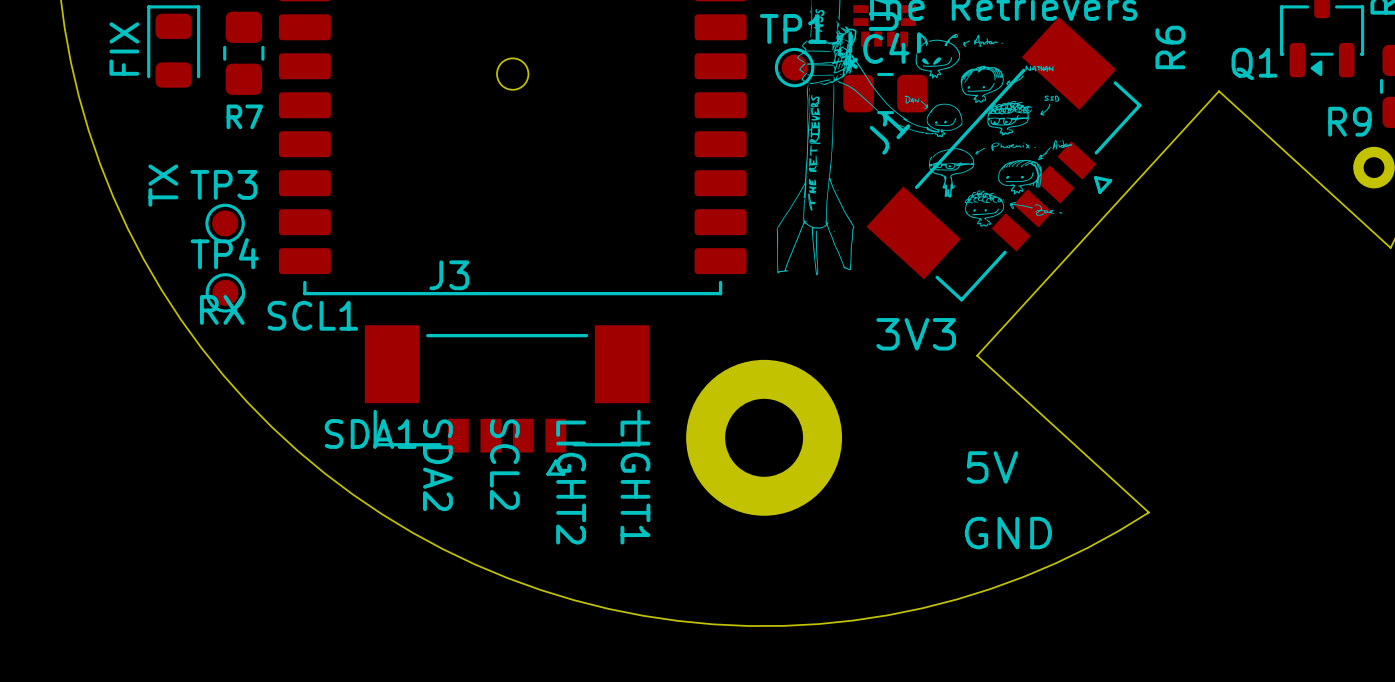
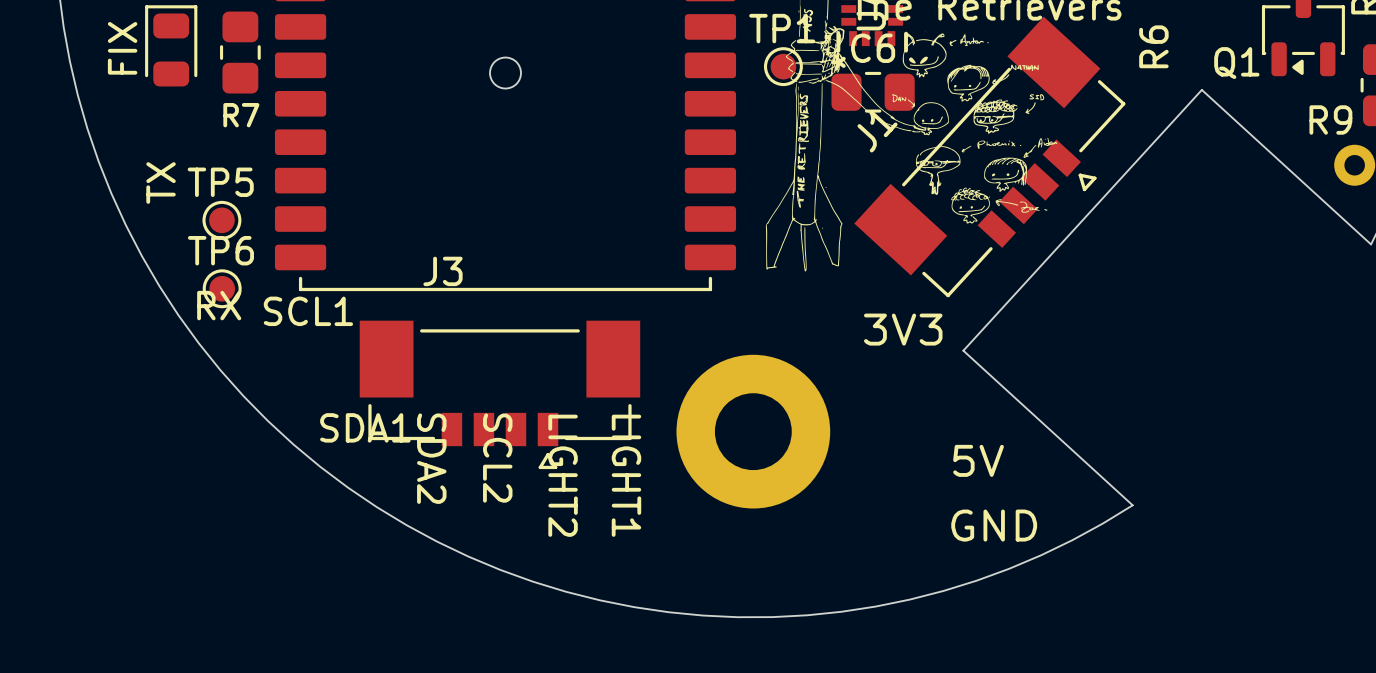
C4 name: C4 (886, 48) -> C6 (873, 48)
TP3 name: TP3 (223, 184) -> TP5 (220, 182)
TP4 name: TP4 (224, 253) -> TP6 (220, 250)

